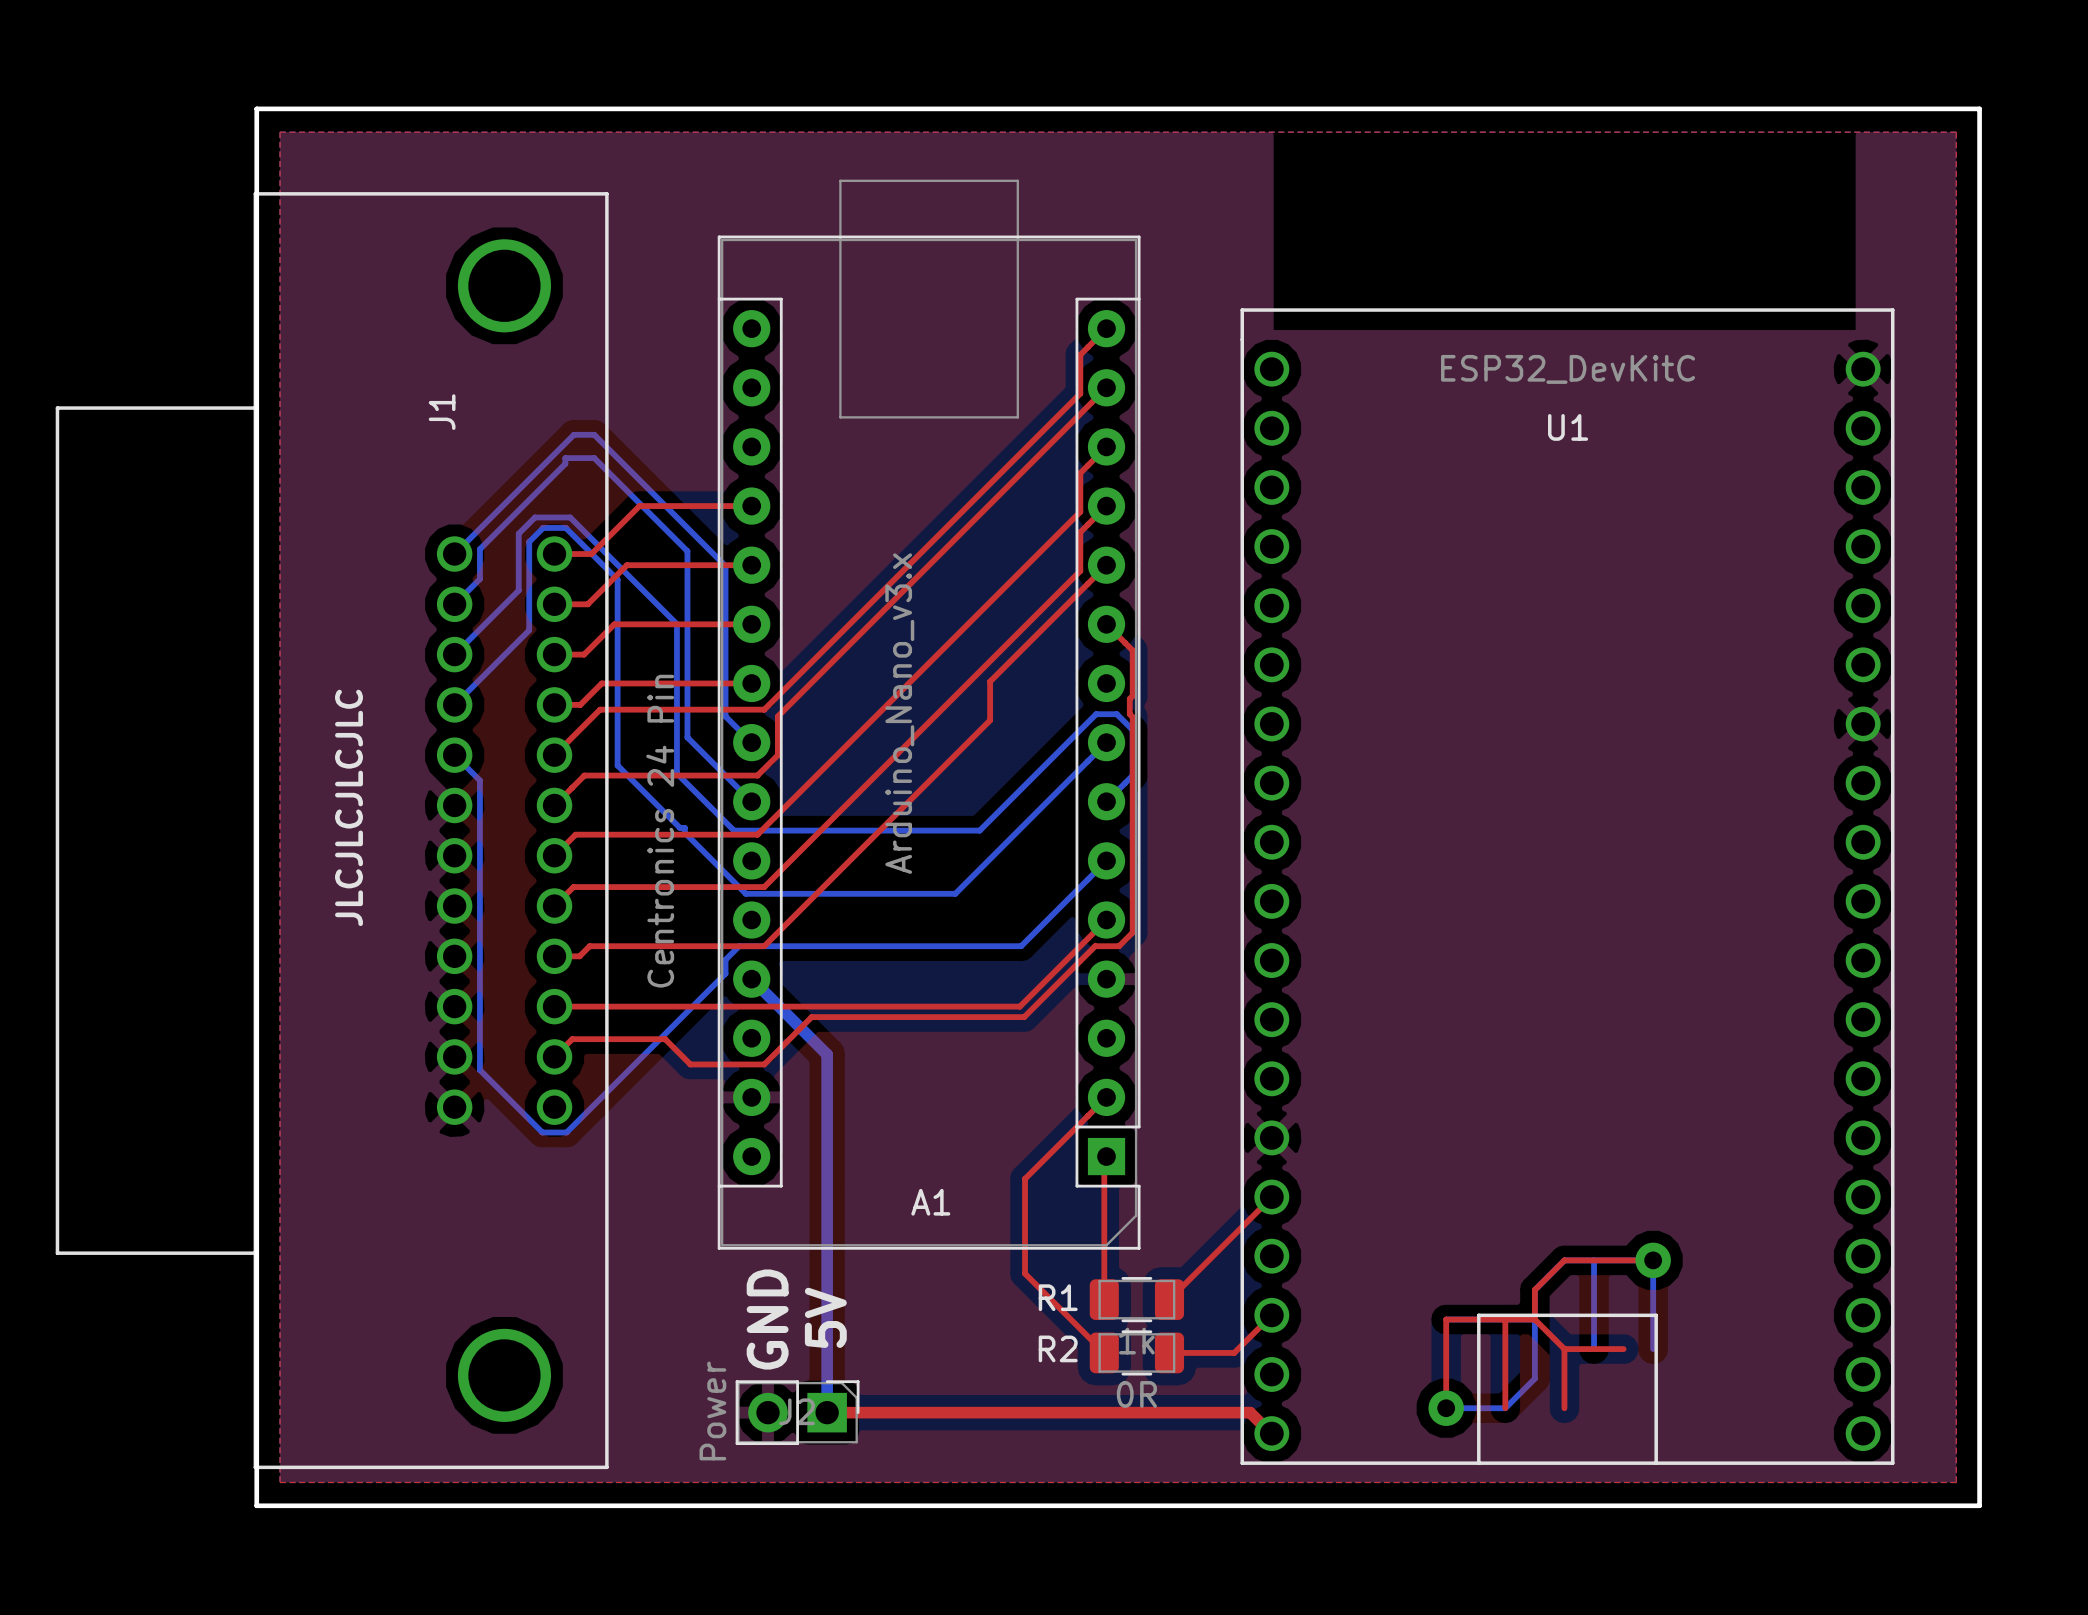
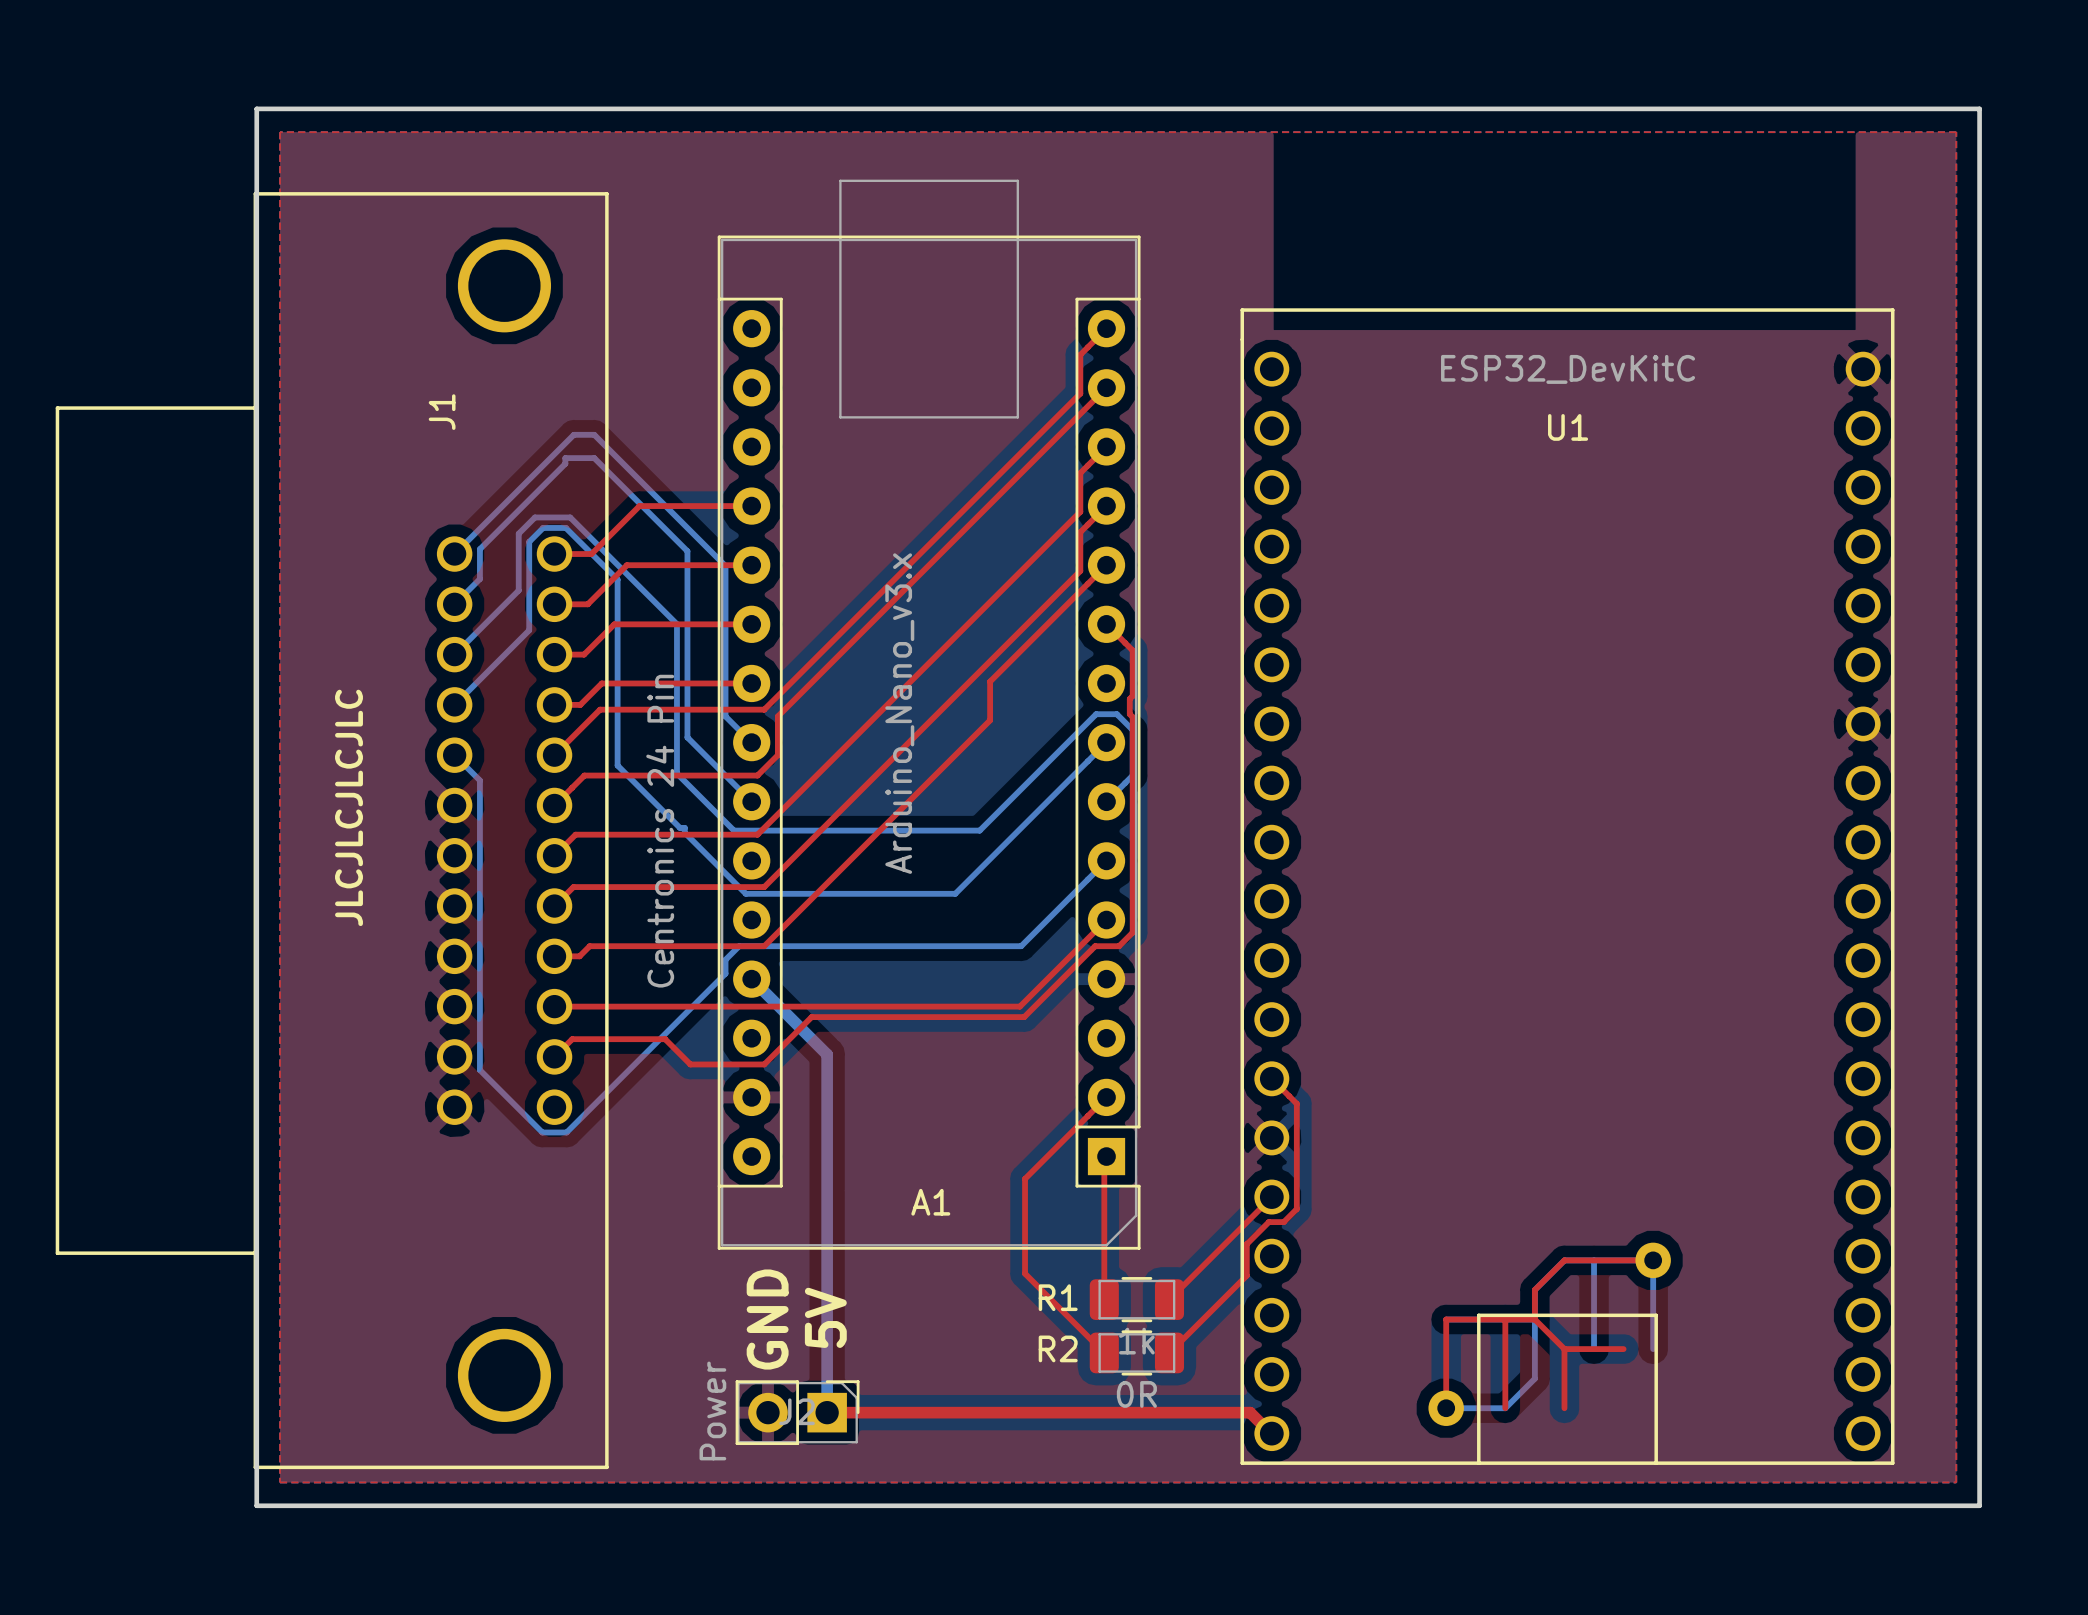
top track: (1271, 1315) (1234, 1352) (1169, 1352) -> (1271, 1078) (1296, 1103) (1296, 1209) (1283, 1222) (1268, 1222) (1246, 1244) (1246, 1275) (1169, 1352)

